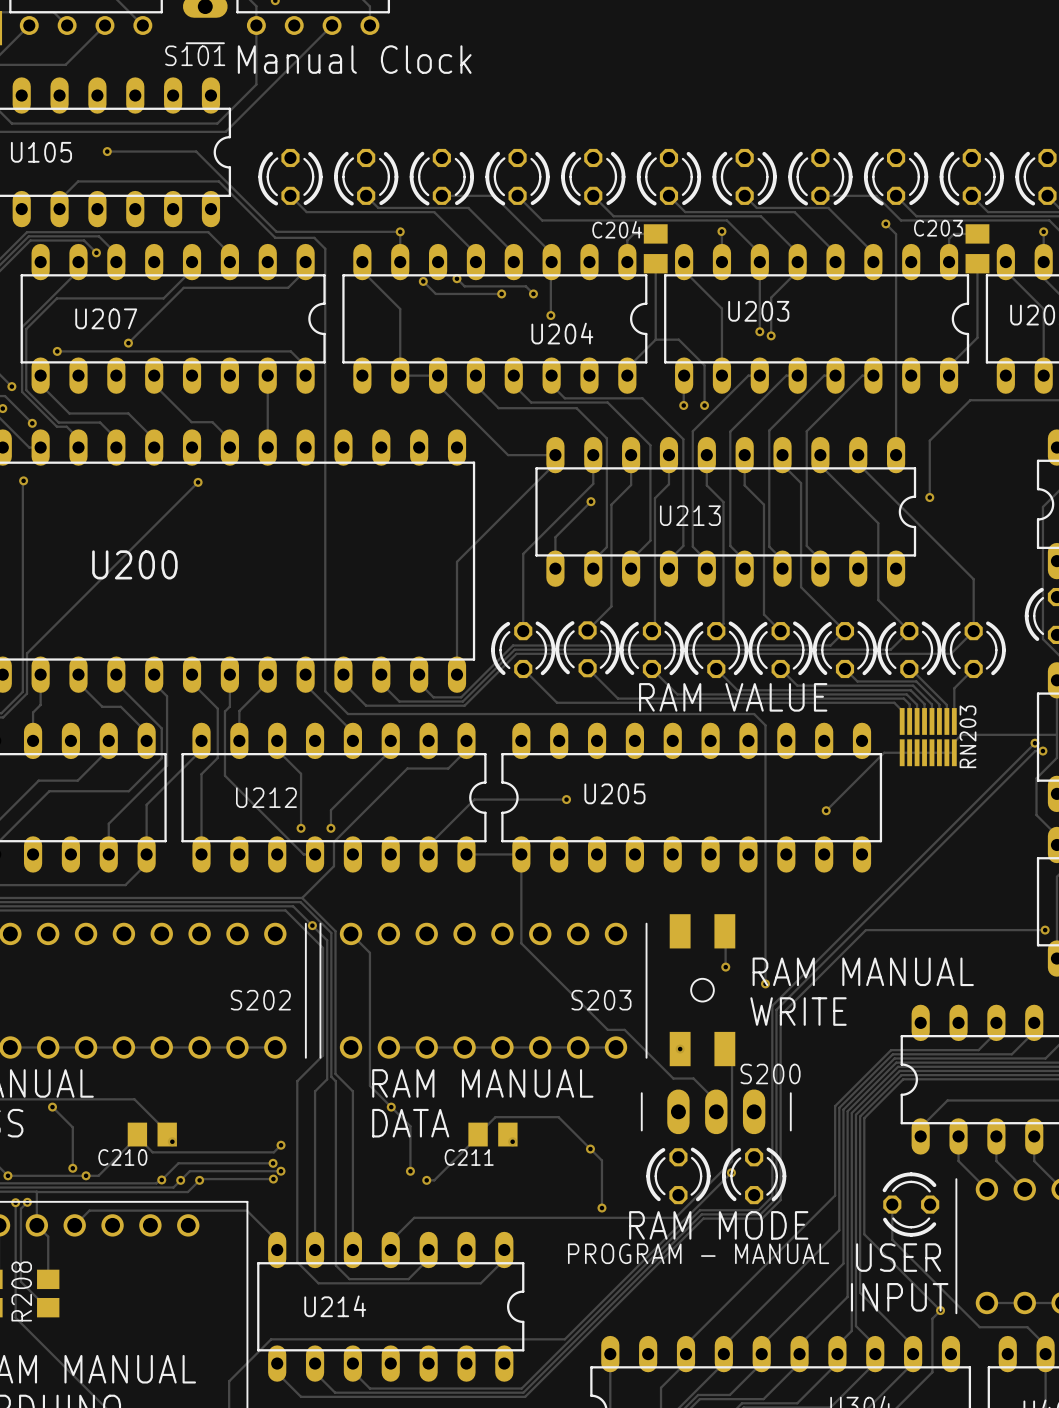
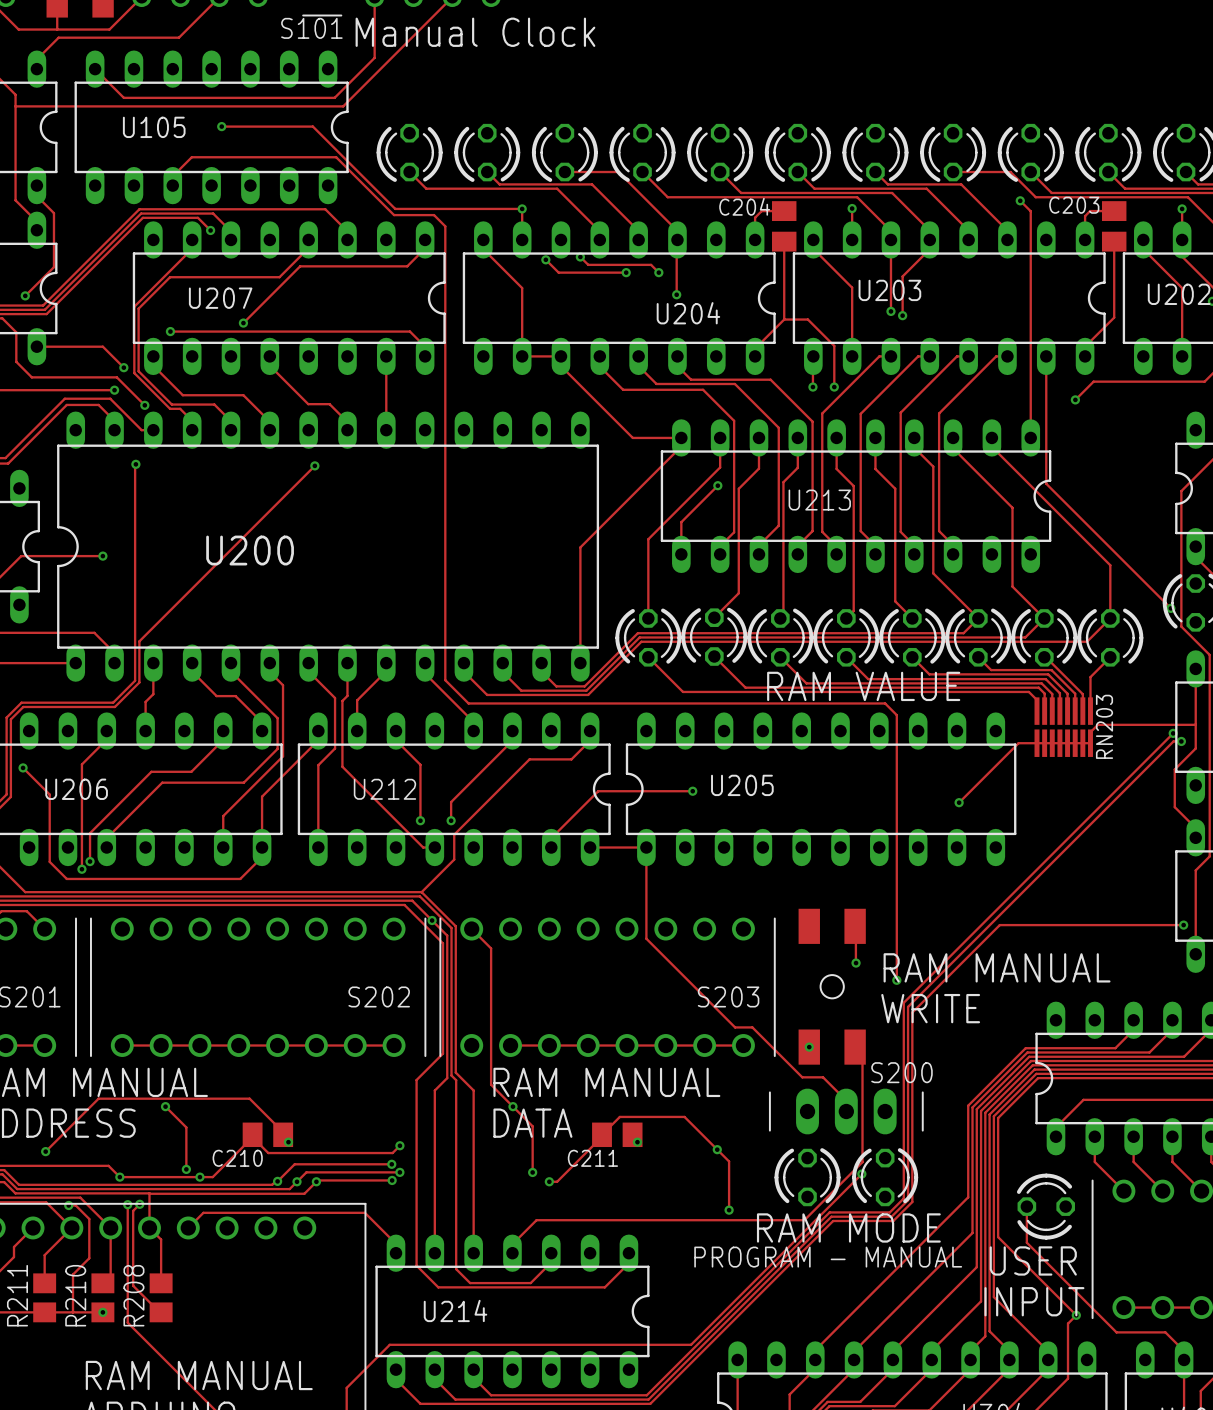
track: none -> (1046, 356) (1046, 483) (1170, 608)
track: (970, 400) (929, 440) (929, 497) -> (1106, 381) (1093, 381) (1075, 399)
via position: (929, 497) -> (1075, 399)
via: none -> (1170, 608)

